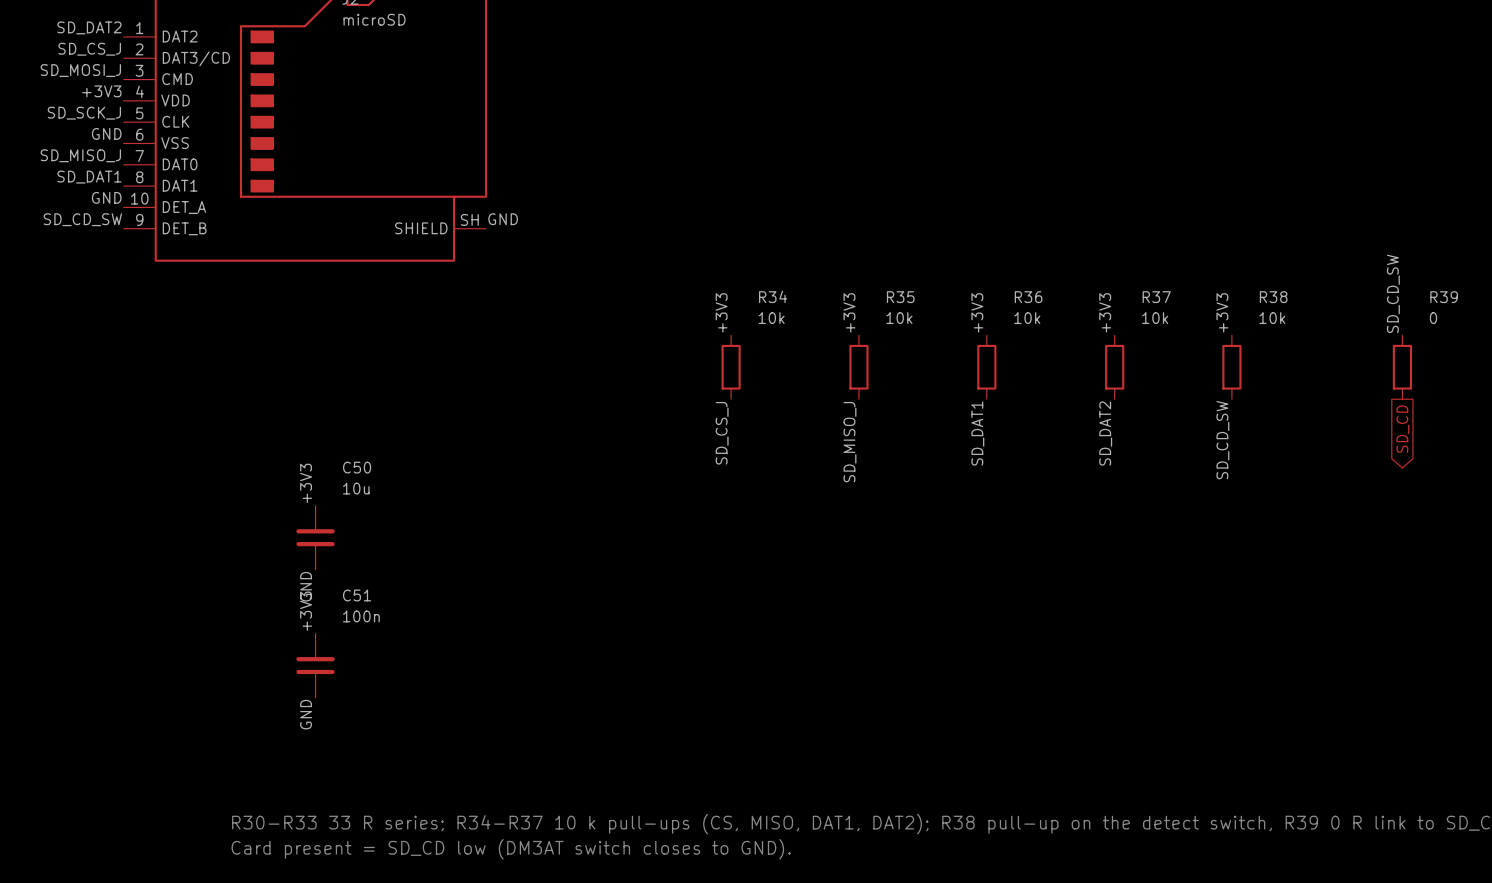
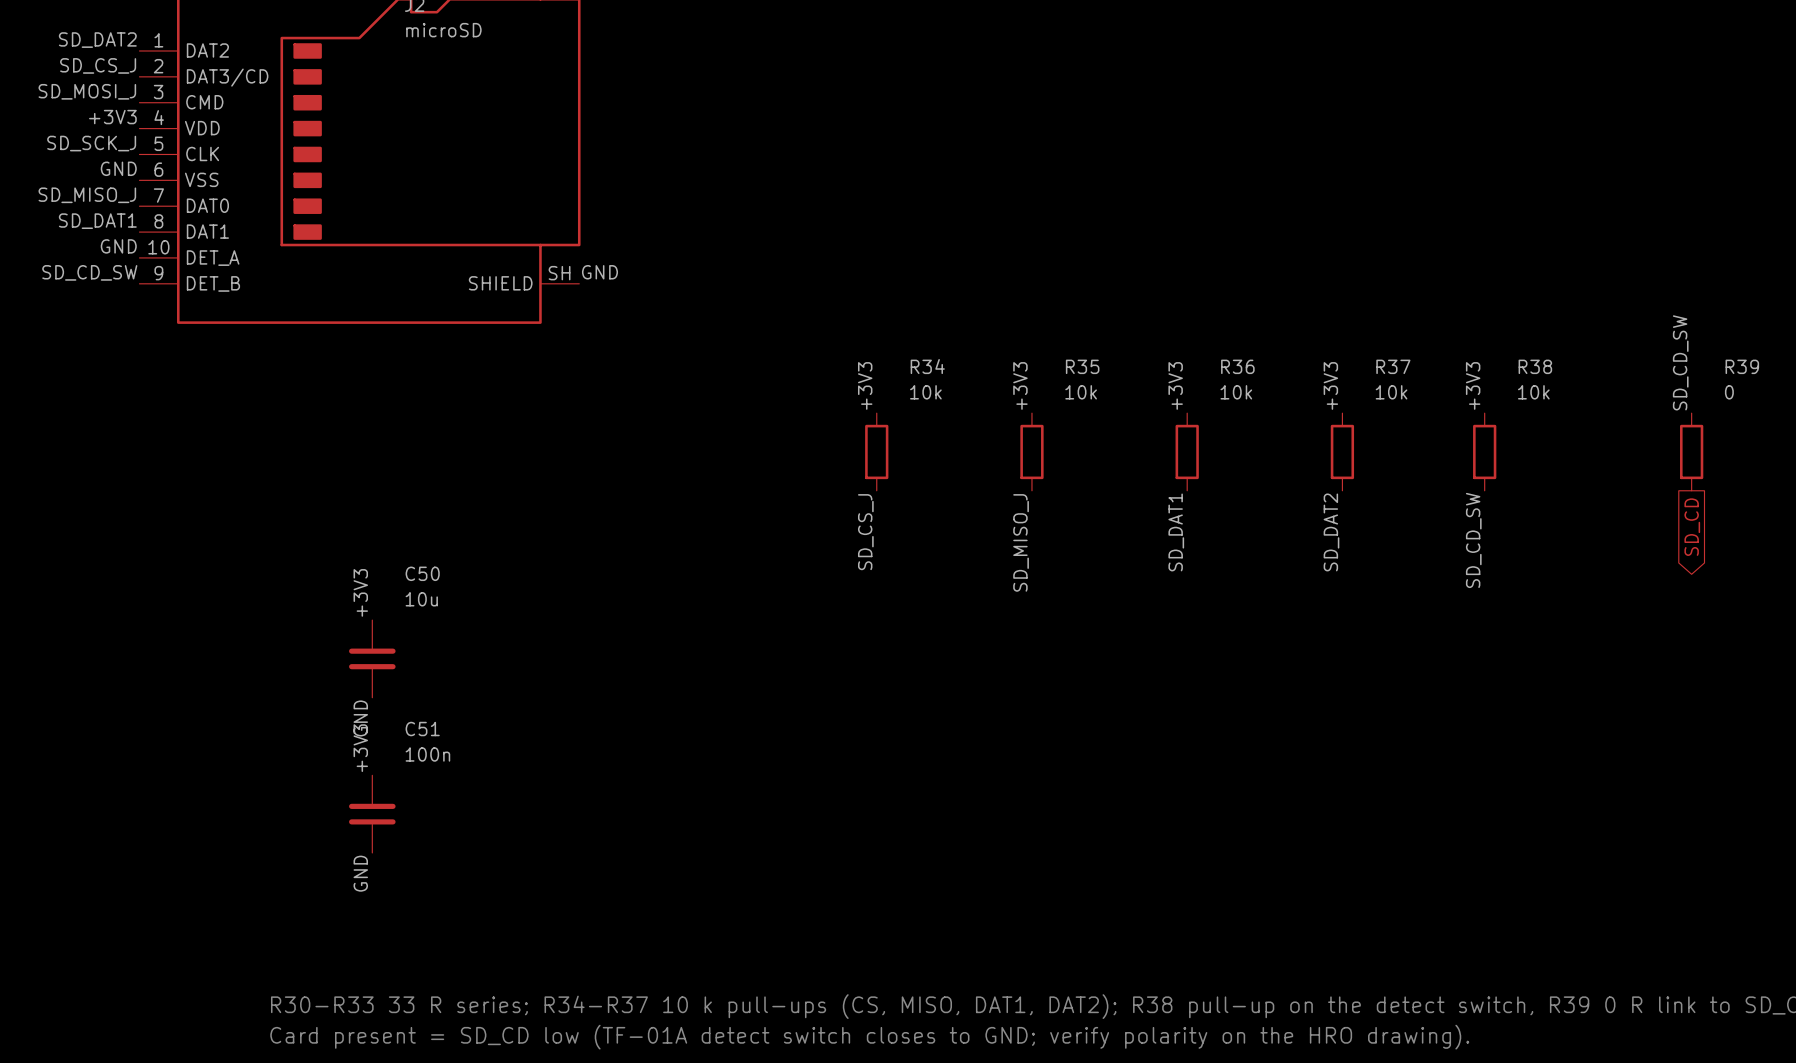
text: Card present = SD_CD low (DM3AT switch closes to GND). (511, 849) -> Card present = SD_CD low (TF-01A detect switch closes to GND; verify polarity on the HRO drawing). (869, 1037)

